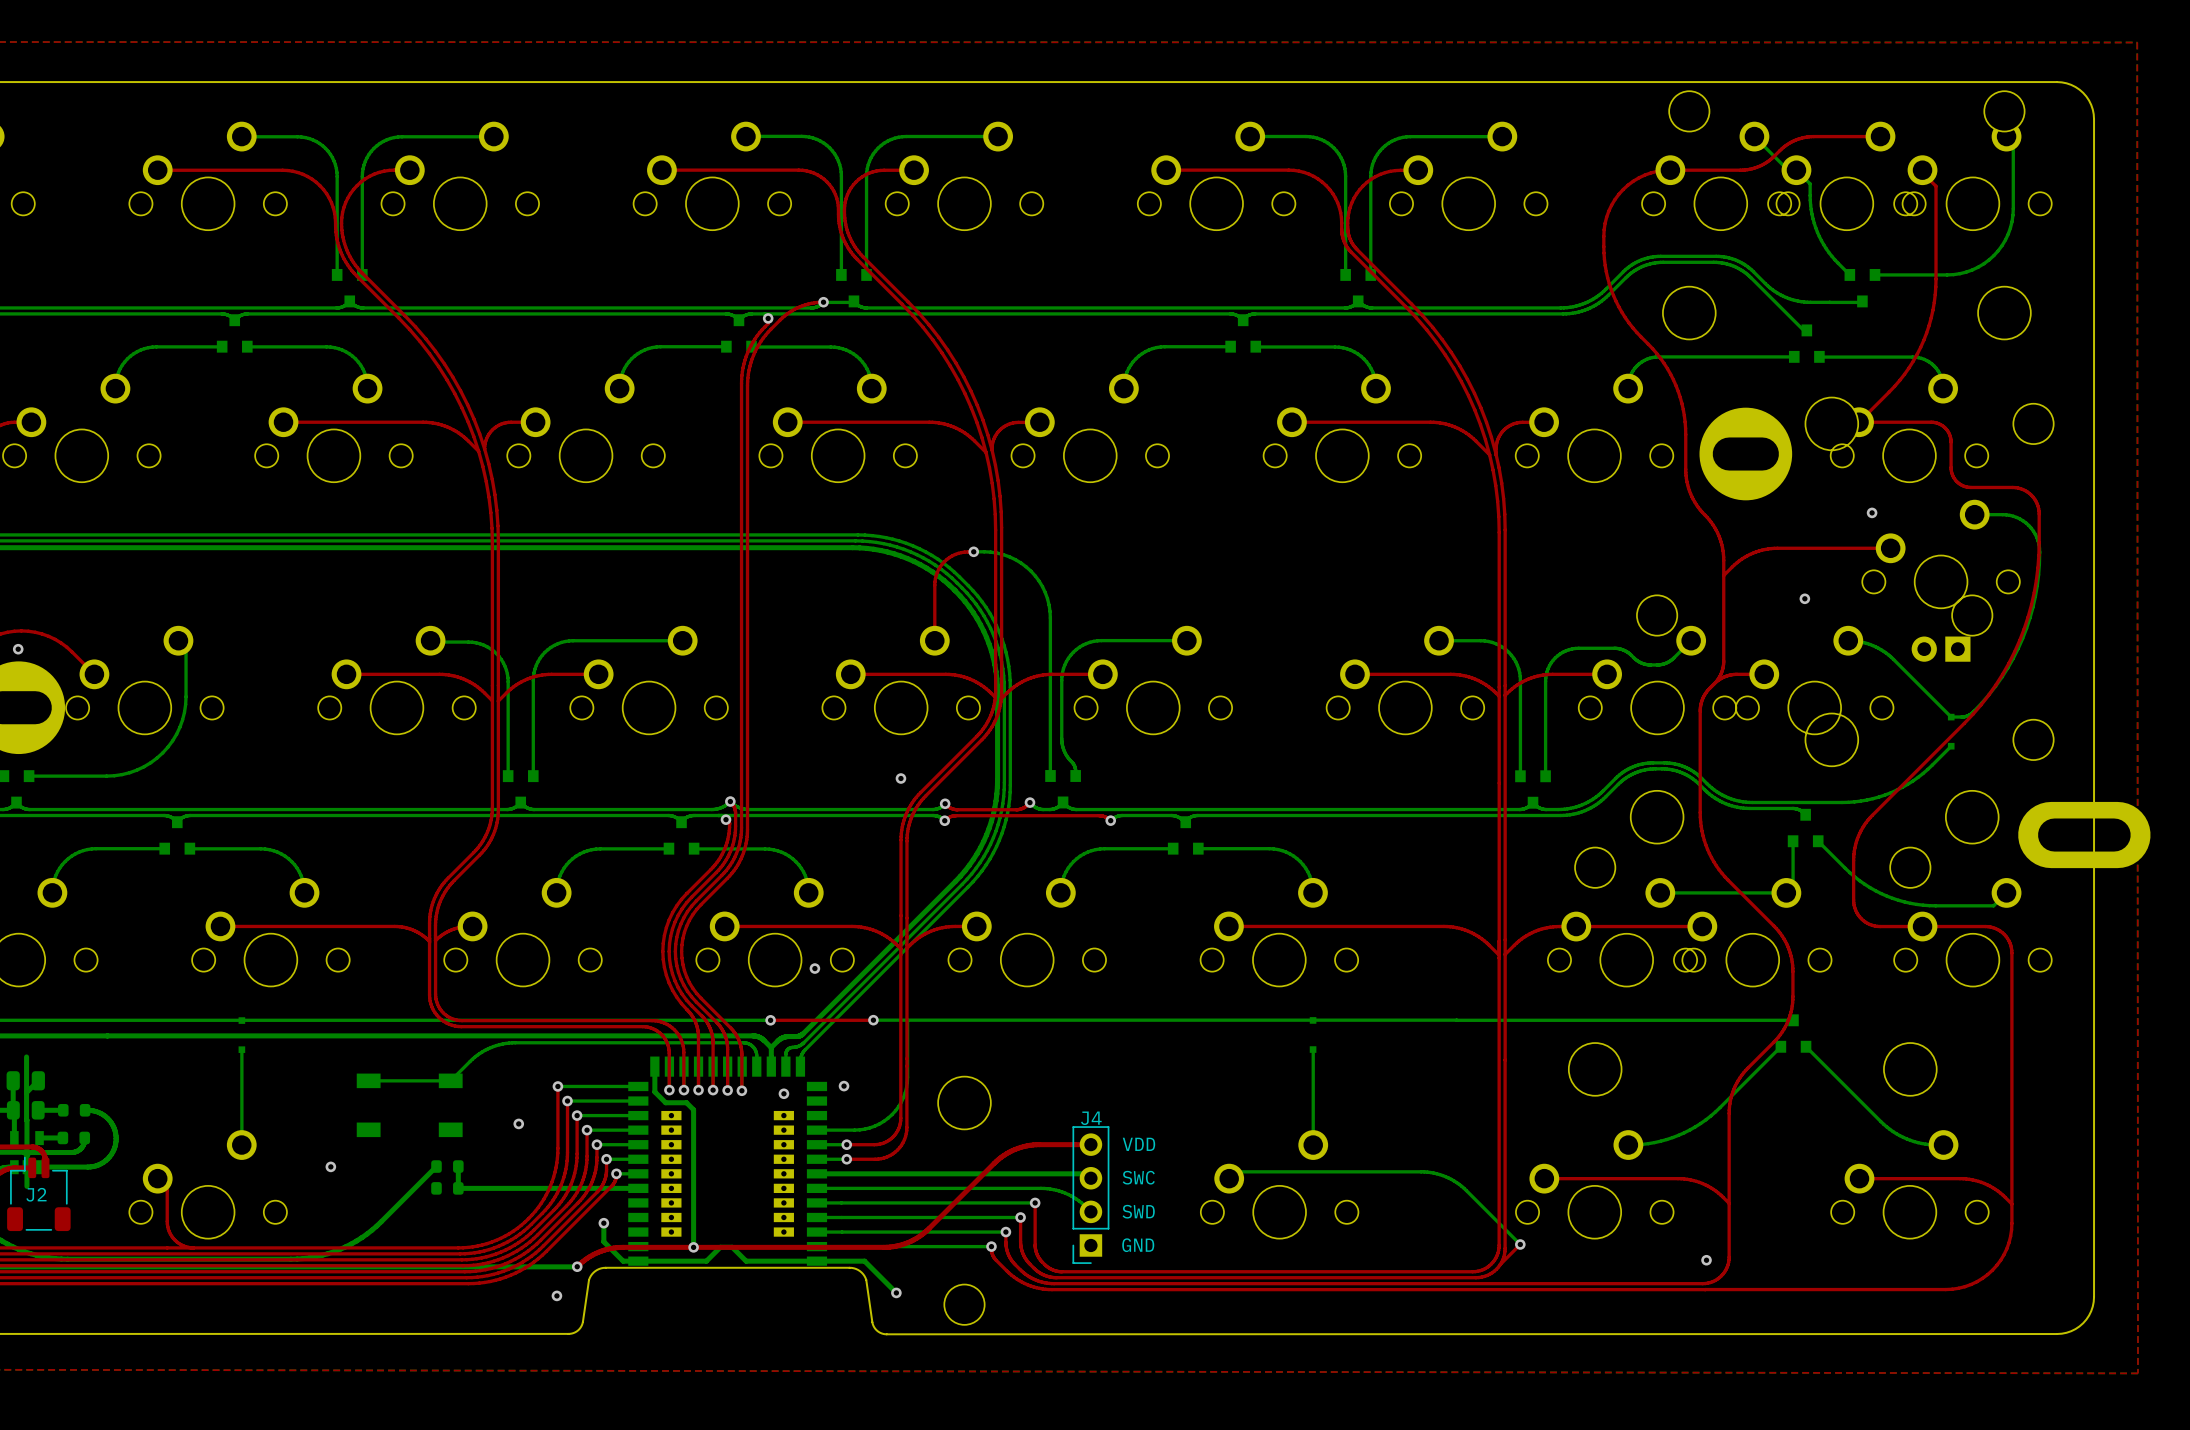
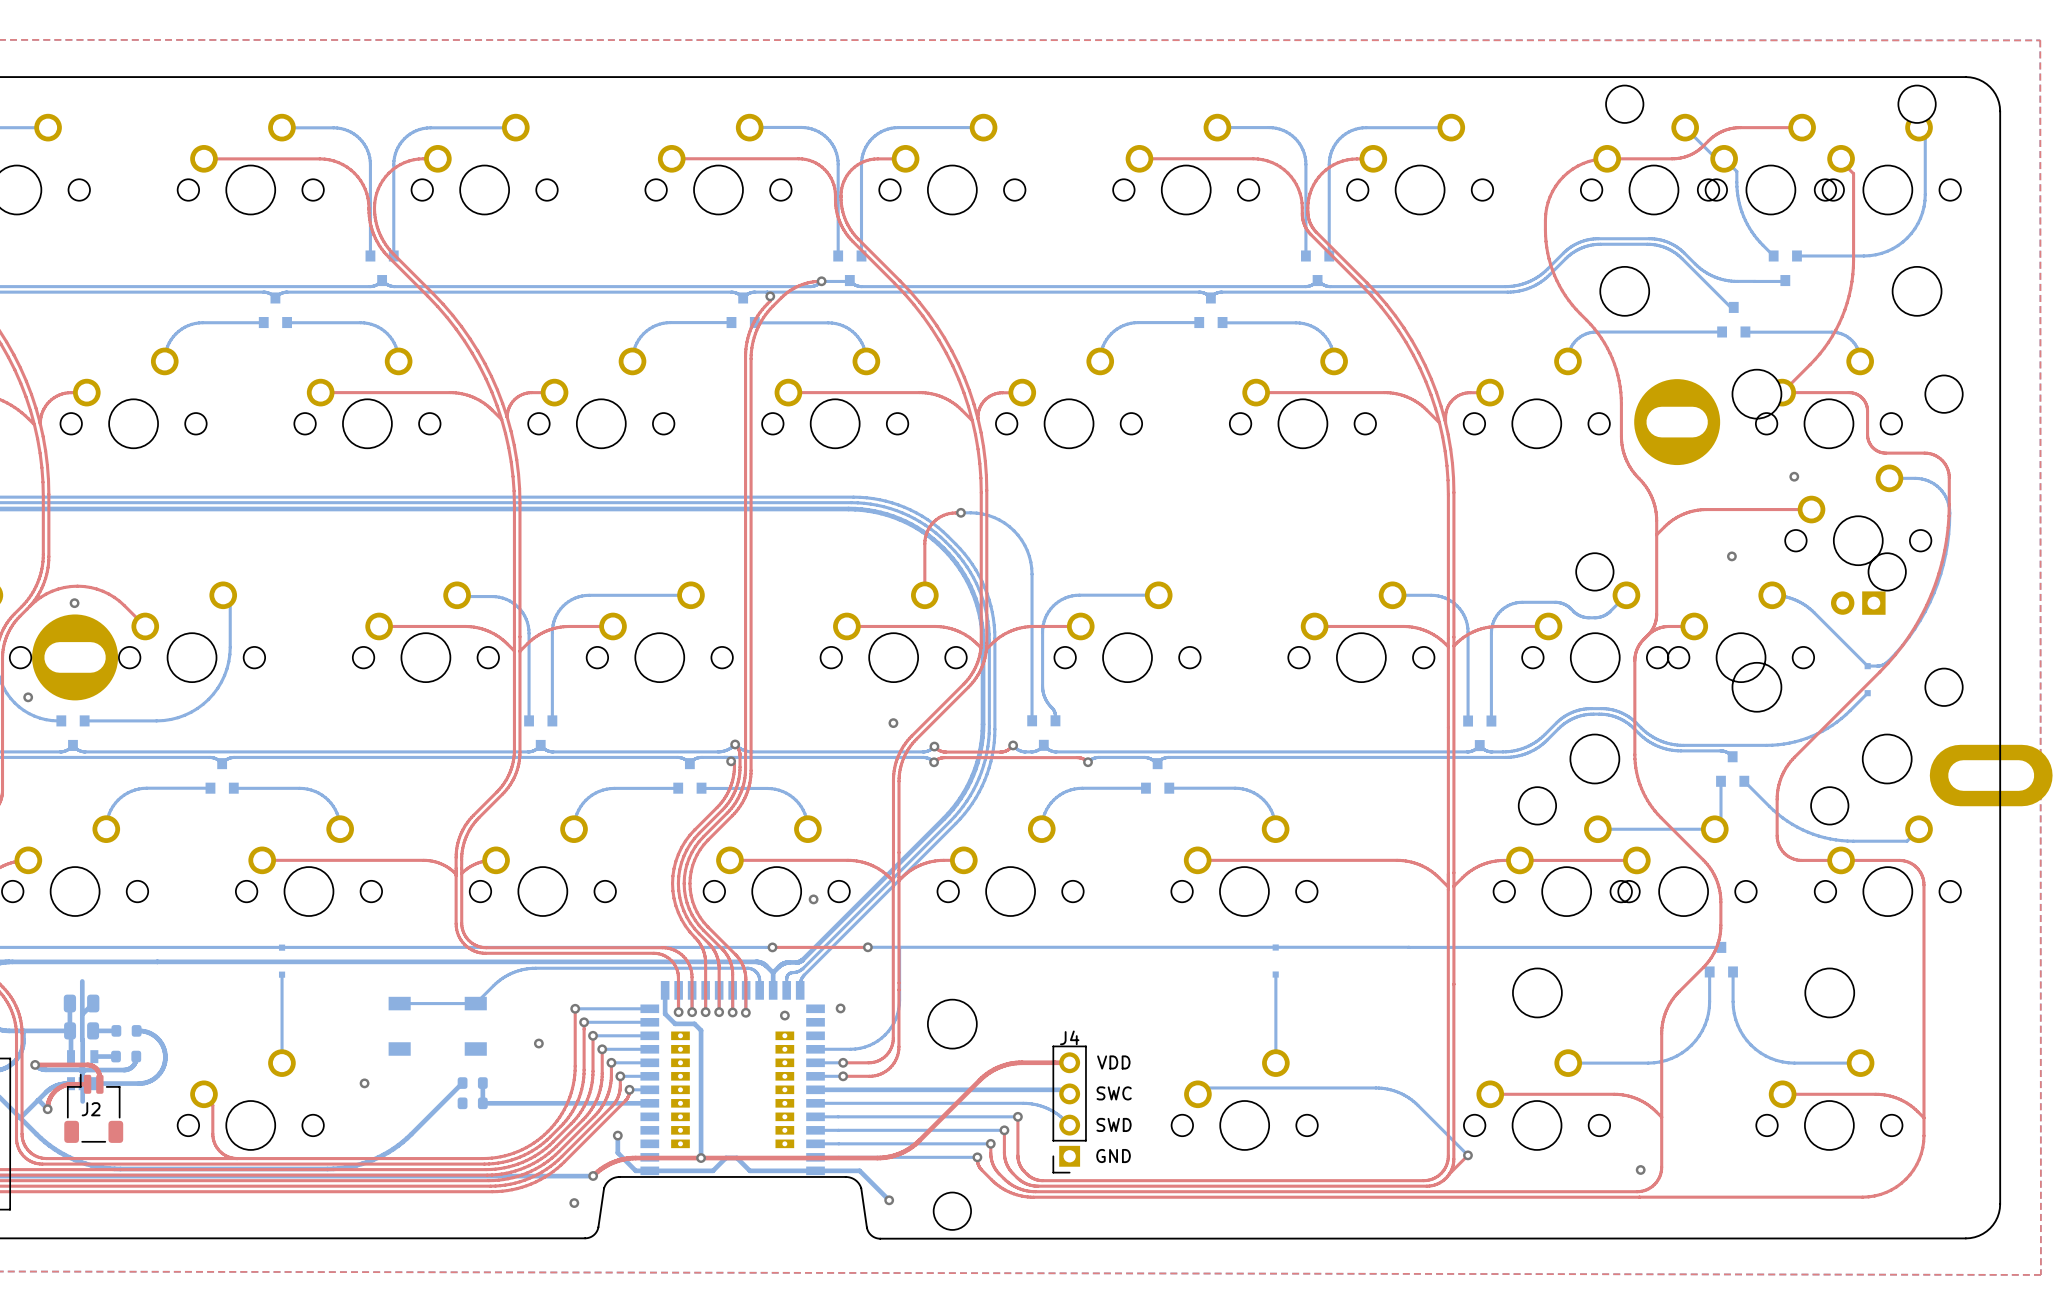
bottom track: (1780, 1046) (1720, 1107) (1700, 1123) (1666, 1139) (1629, 1145) -> (1709, 972) (1709, 1007) (1706, 1019) (1699, 1035) (1682, 1052) (1666, 1060) (1654, 1062) (1569, 1063)
bottom track: (1806, 1046) (1889, 1129) (1910, 1140) (1937, 1145) -> (1733, 972) (1733, 1007) (1735, 1019) (1743, 1035) (1755, 1049) (1770, 1058) (1788, 1062) (1854, 1063)

